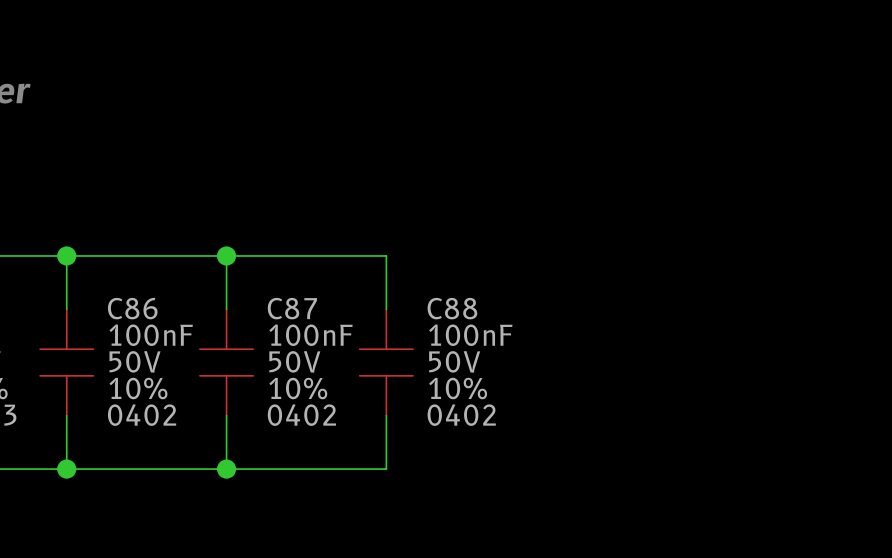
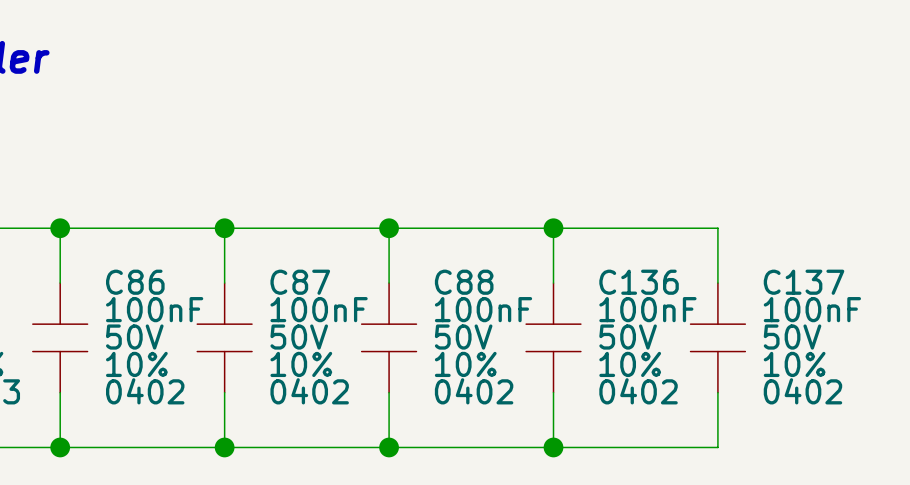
wire: none -> (389, 228) (717, 228) (717, 283)
junction: none -> (389, 228)
wire: none -> (553, 228) (553, 283)
junction: none -> (553, 228)
C136: none -> 100nF (553, 337)
C137: none -> 100nF (717, 337)
wire: none -> (553, 392) (553, 447)
wire: none -> (717, 392) (717, 447) (389, 447)
junction: none -> (389, 447)
junction: none -> (553, 447)

